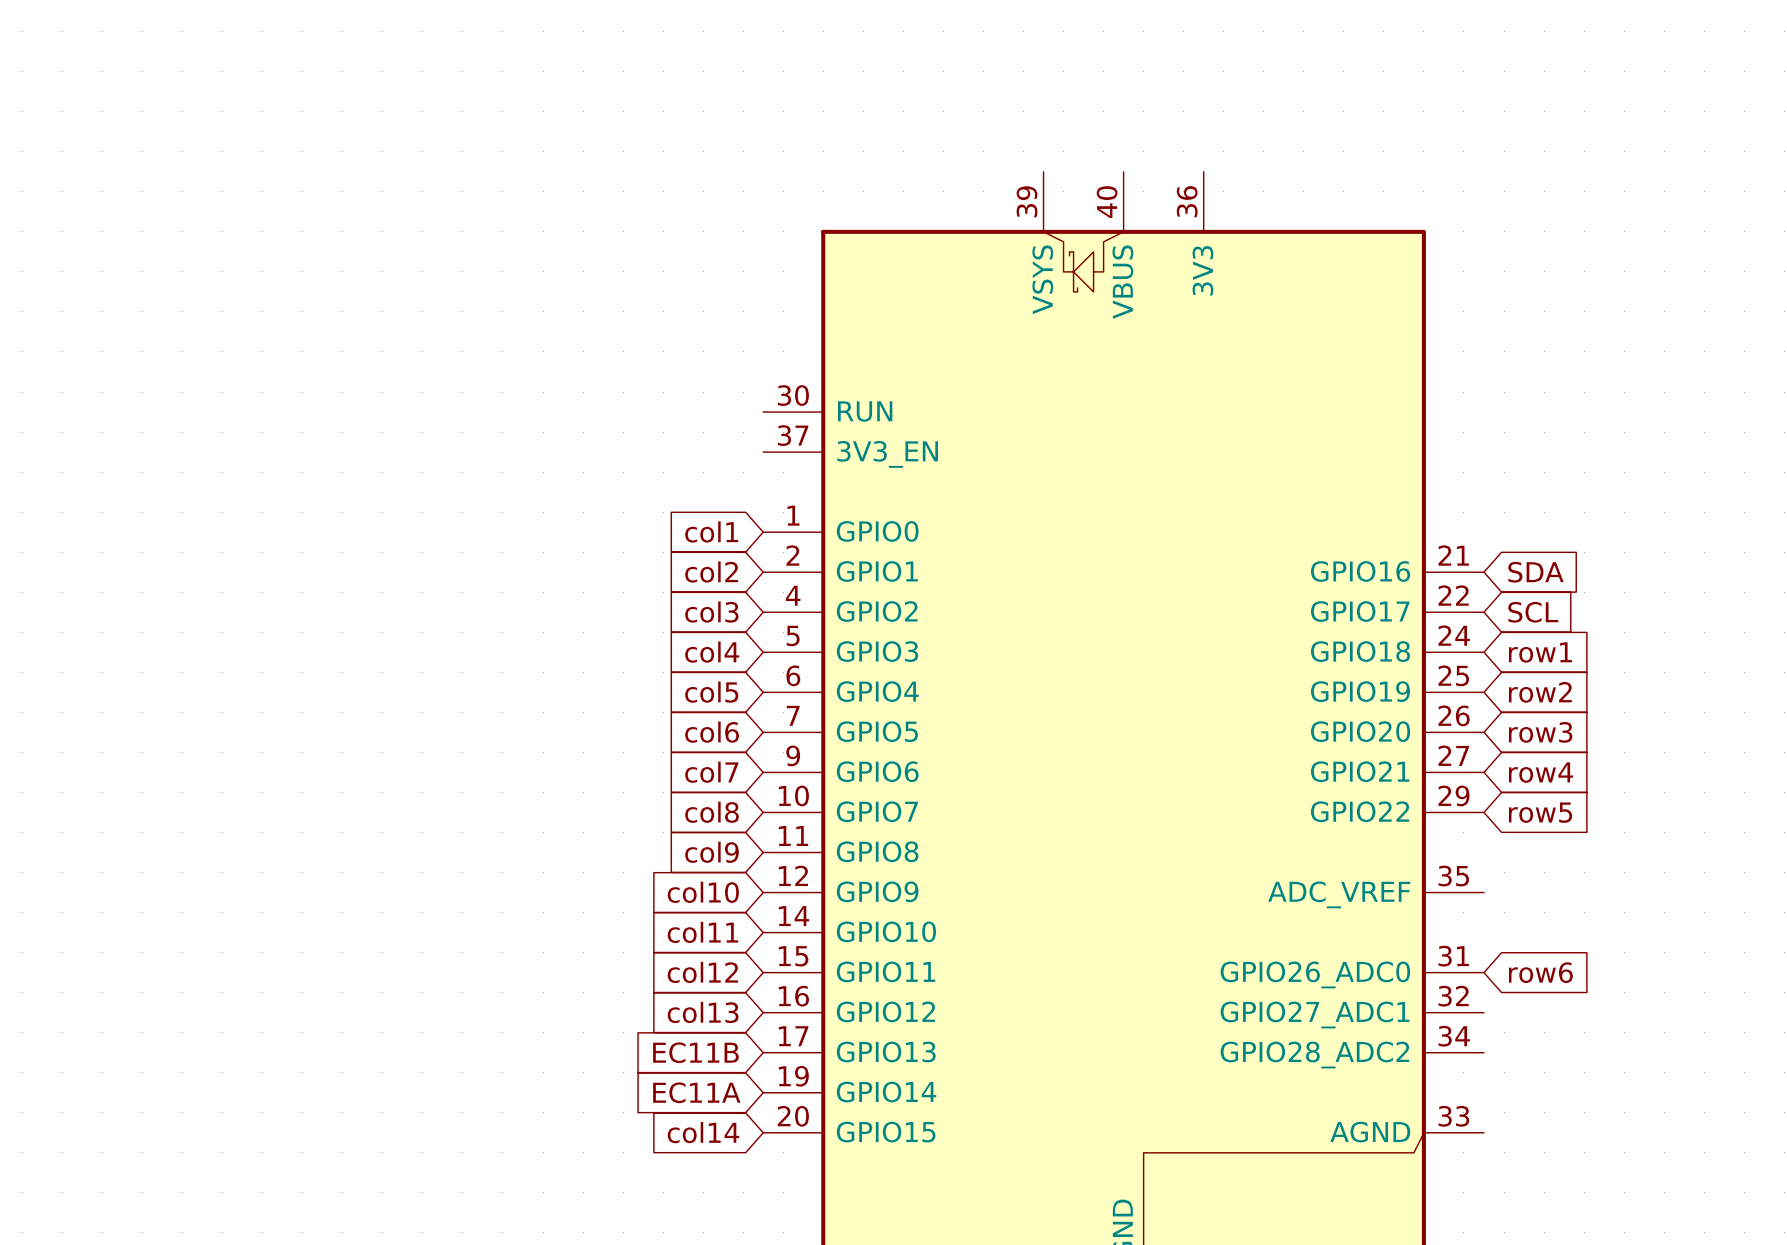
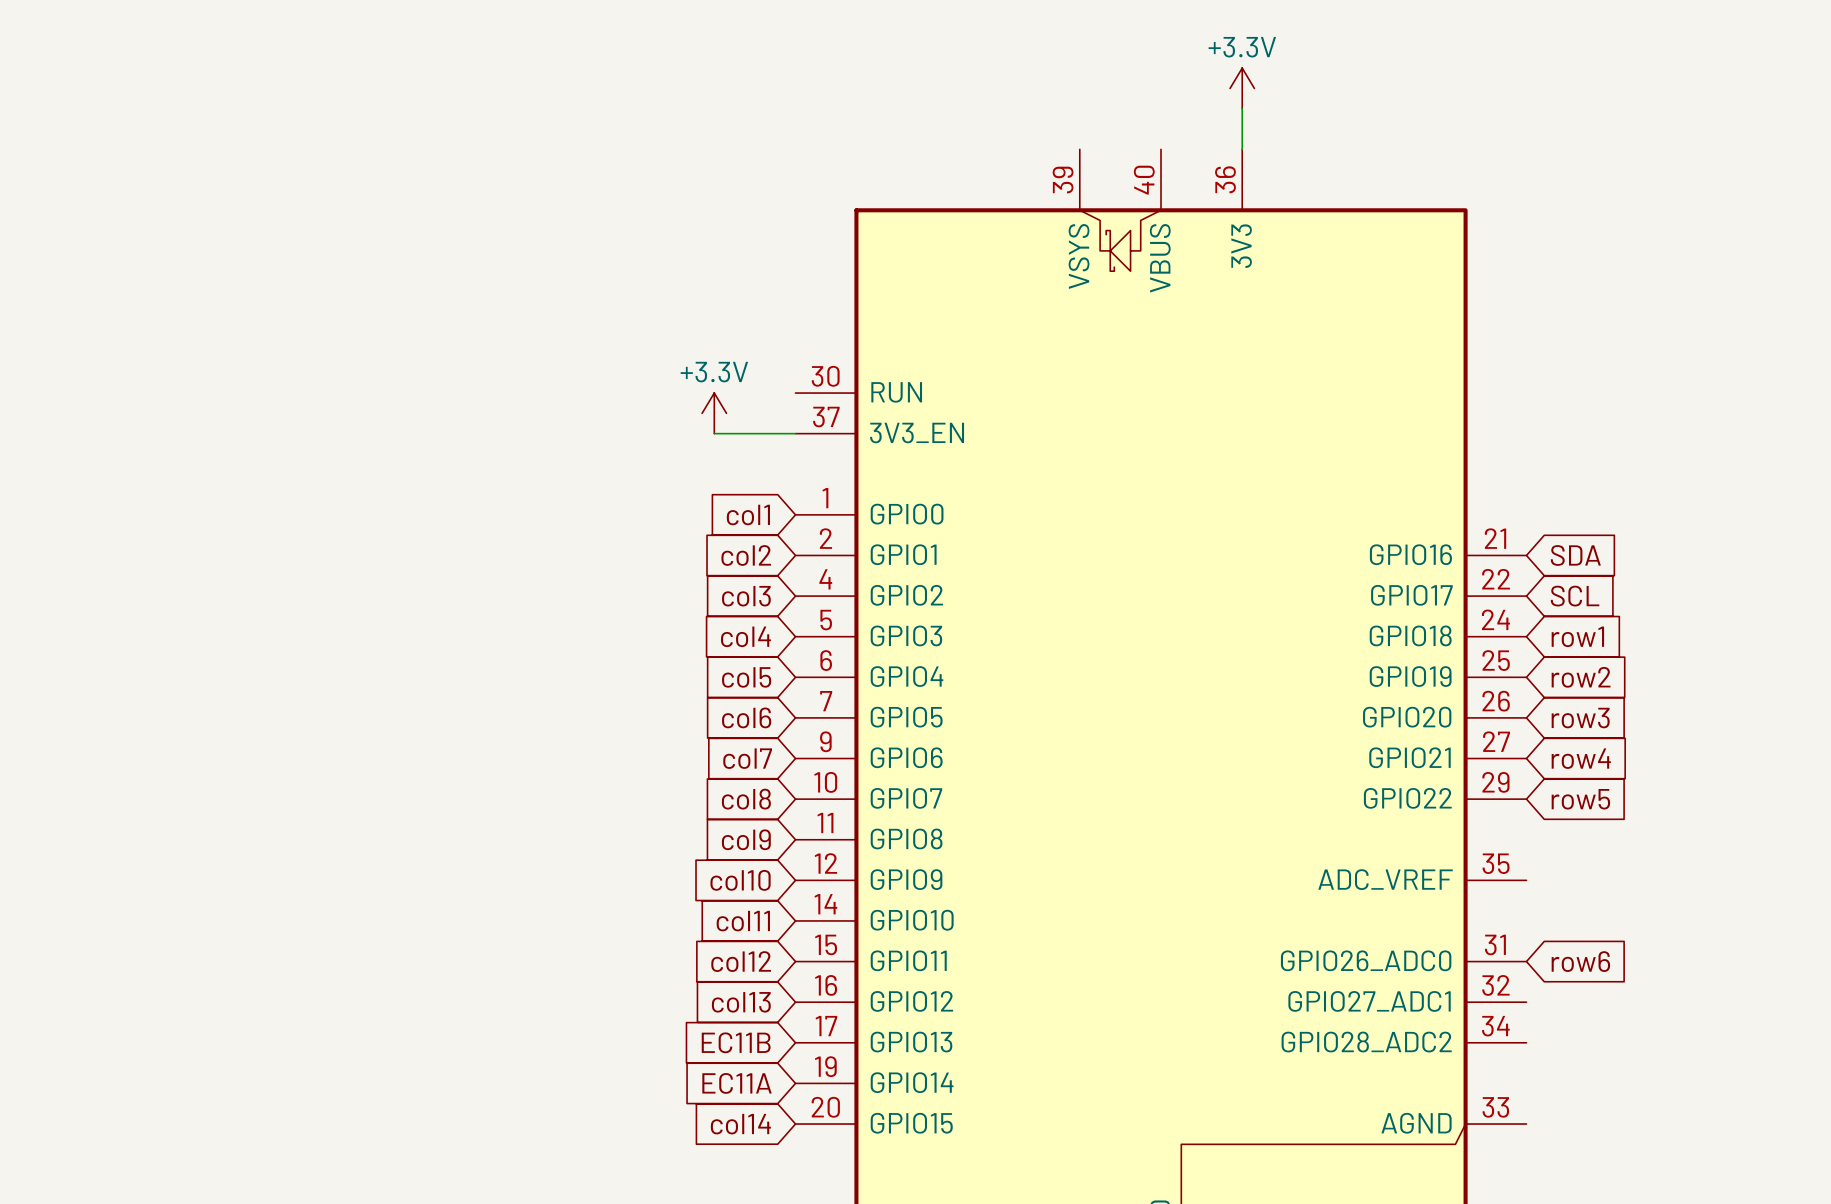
power symbol: none -> +3.3V (1242, 88)
wire: none -> (1242, 108) (1242, 149)
power symbol: none -> +3.3V (714, 413)
wire: none -> (714, 433) (795, 433)

